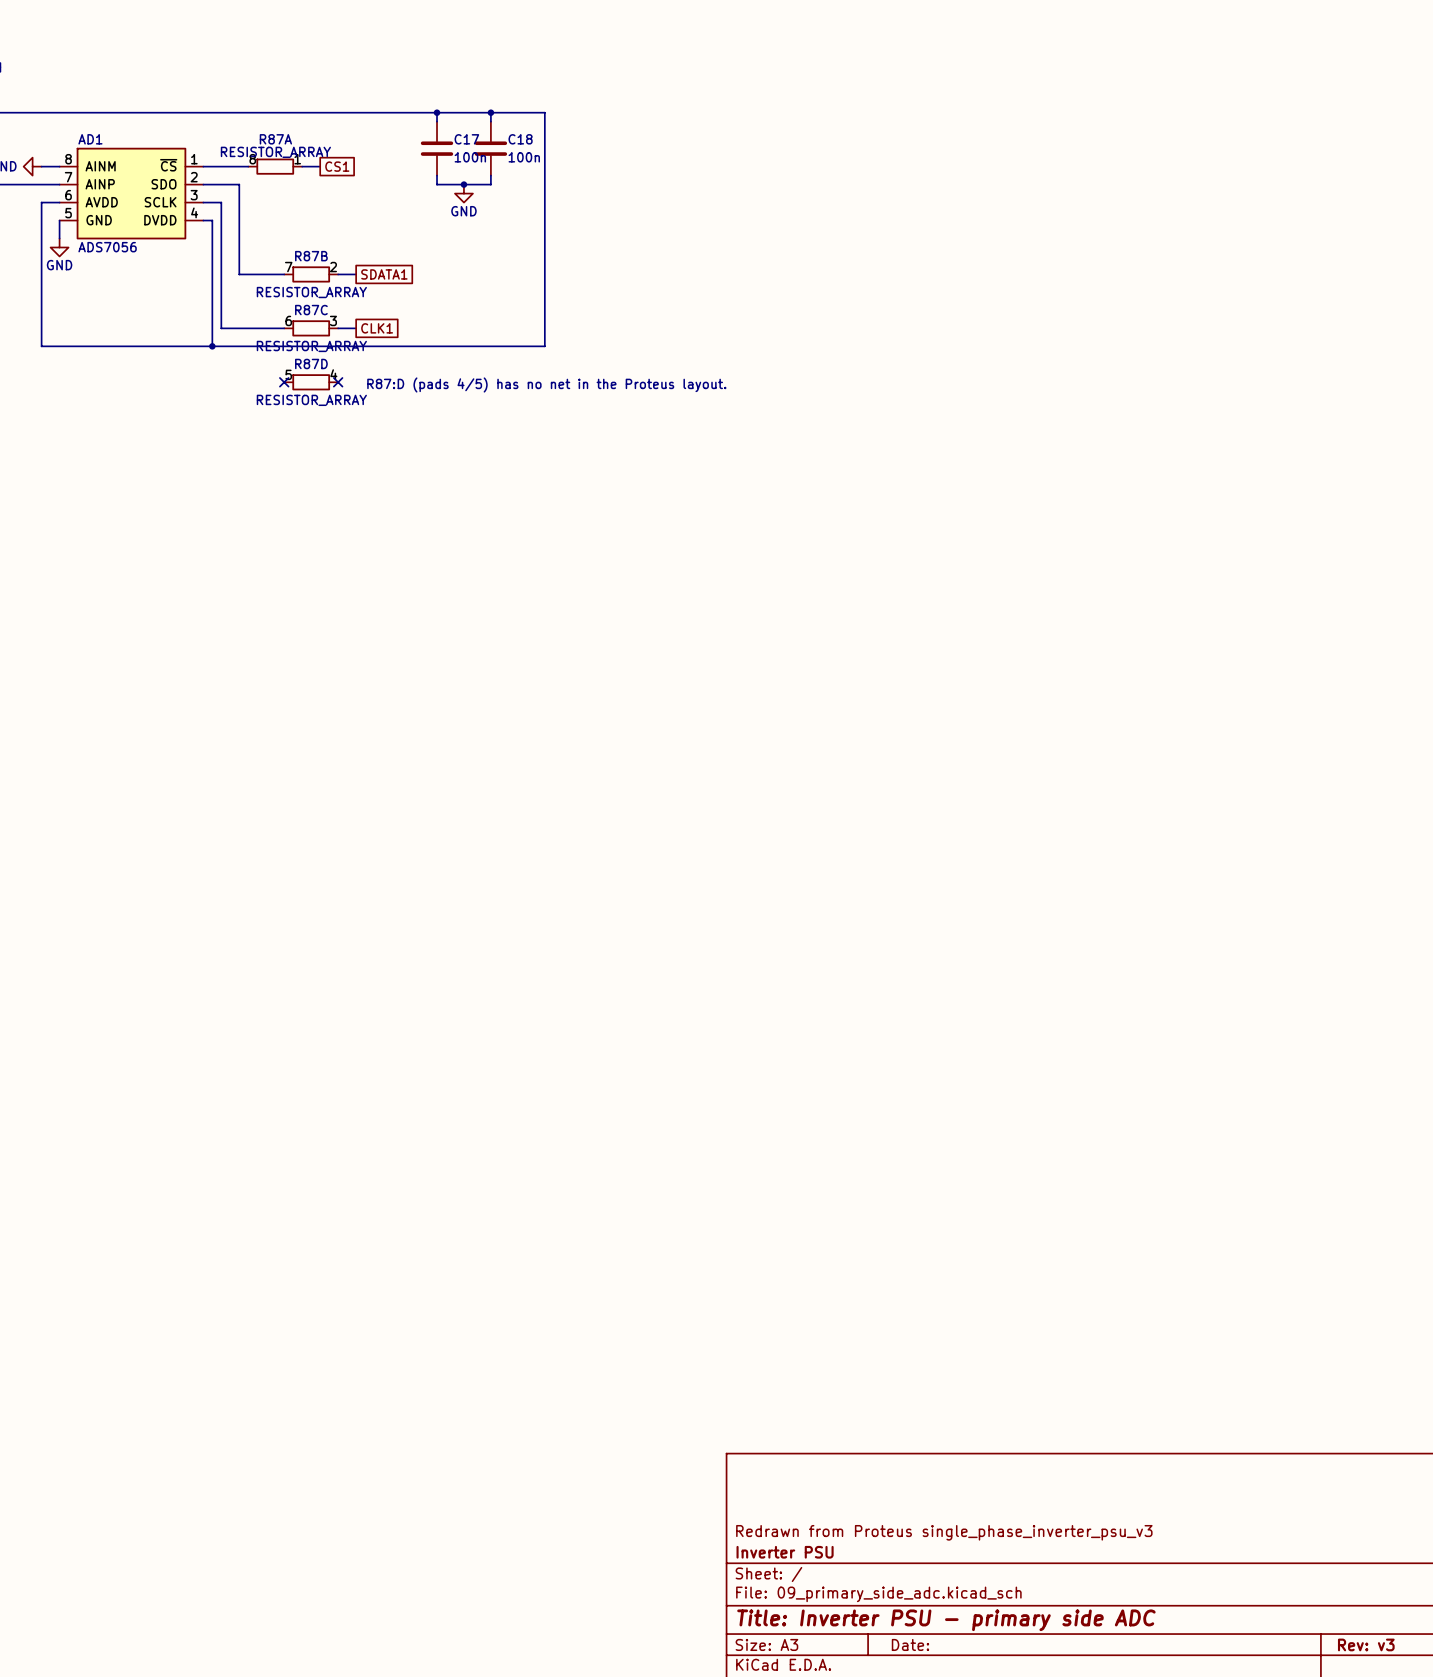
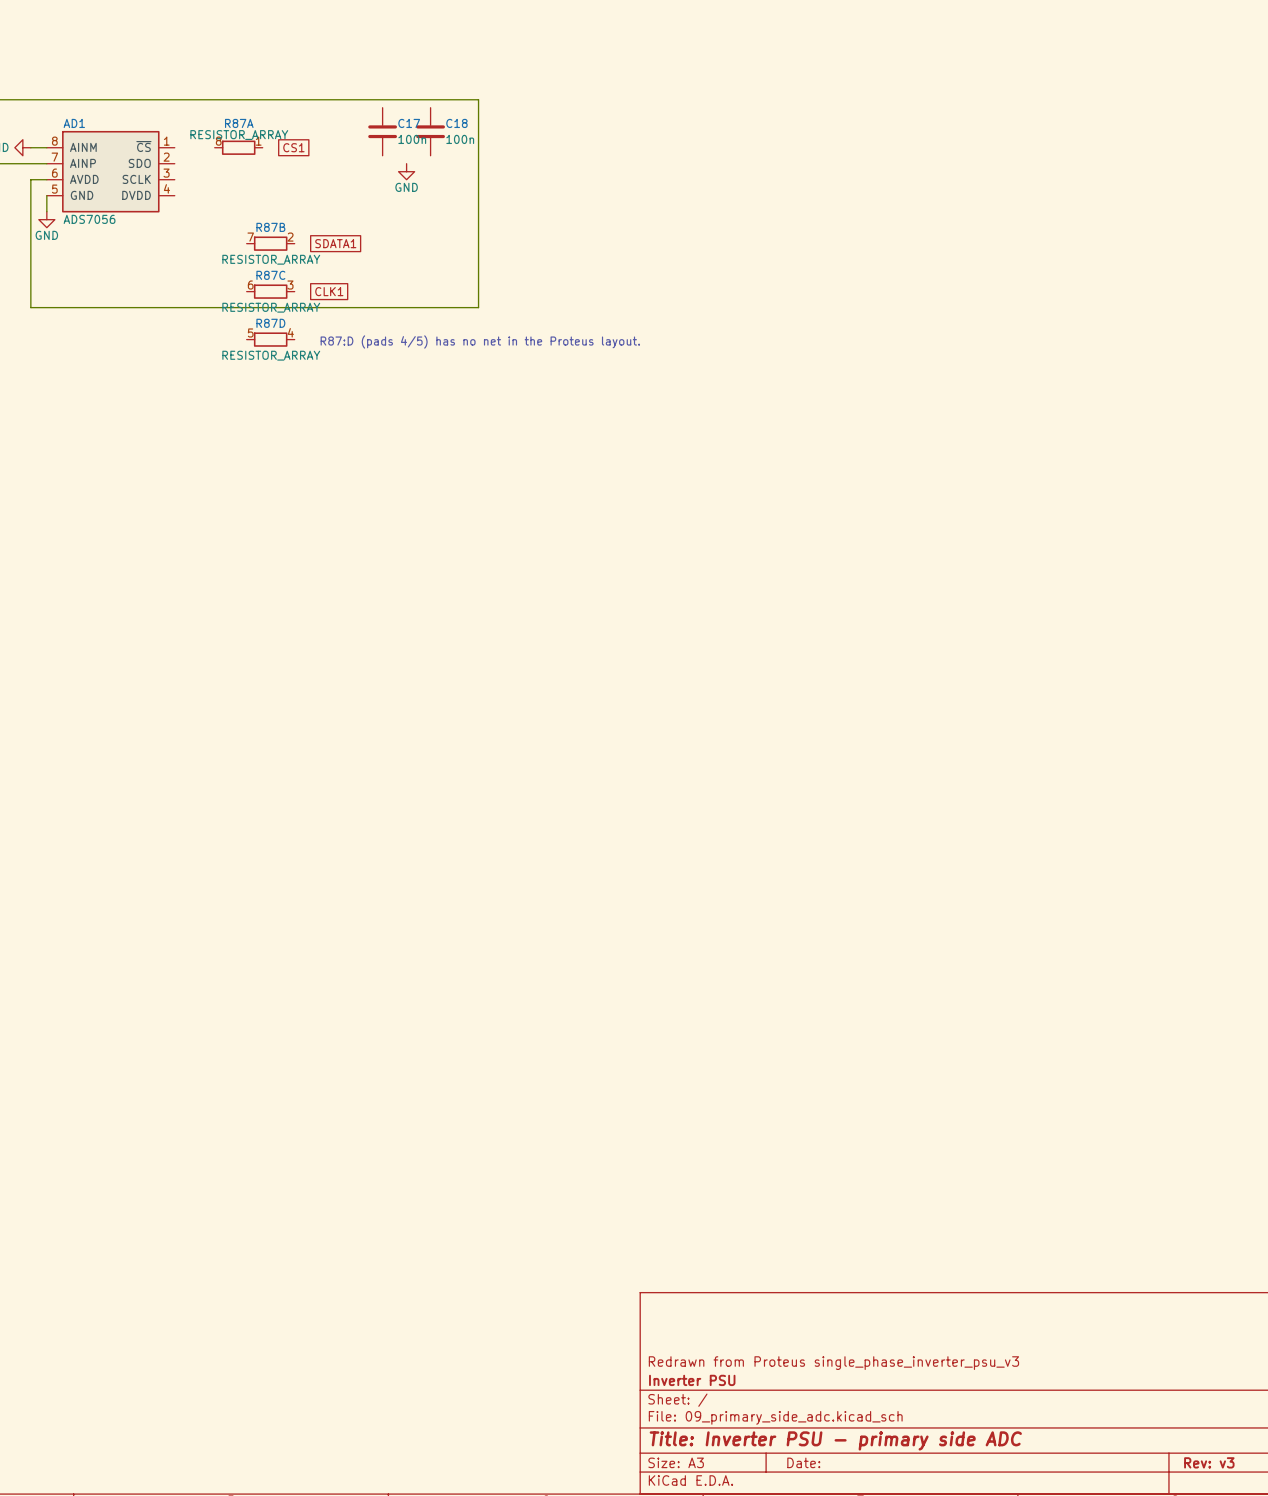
wire: (437, 112) (437, 121) -> none
junction: (437, 112) -> none
wire: (490, 112) (490, 121) -> none
junction: (490, 112) -> none
wire: (203, 166) (248, 166) -> none
wire: (302, 166) (320, 166) -> none
wire: (437, 175) (437, 184) (490, 184) (490, 175) -> none
wire: (203, 184) (239, 184) (239, 274) (284, 274) -> none
junction: (463, 184) -> none
wire: (203, 202) (221, 202) (221, 328) (284, 328) -> none
wire: (203, 220) (212, 220) (212, 346) -> none
wire: (338, 274) (356, 274) -> none
wire: (338, 328) (356, 328) -> none
junction: (212, 346) -> none
no-connect mark: (284, 382) -> none
no-connect mark: (338, 382) -> none

